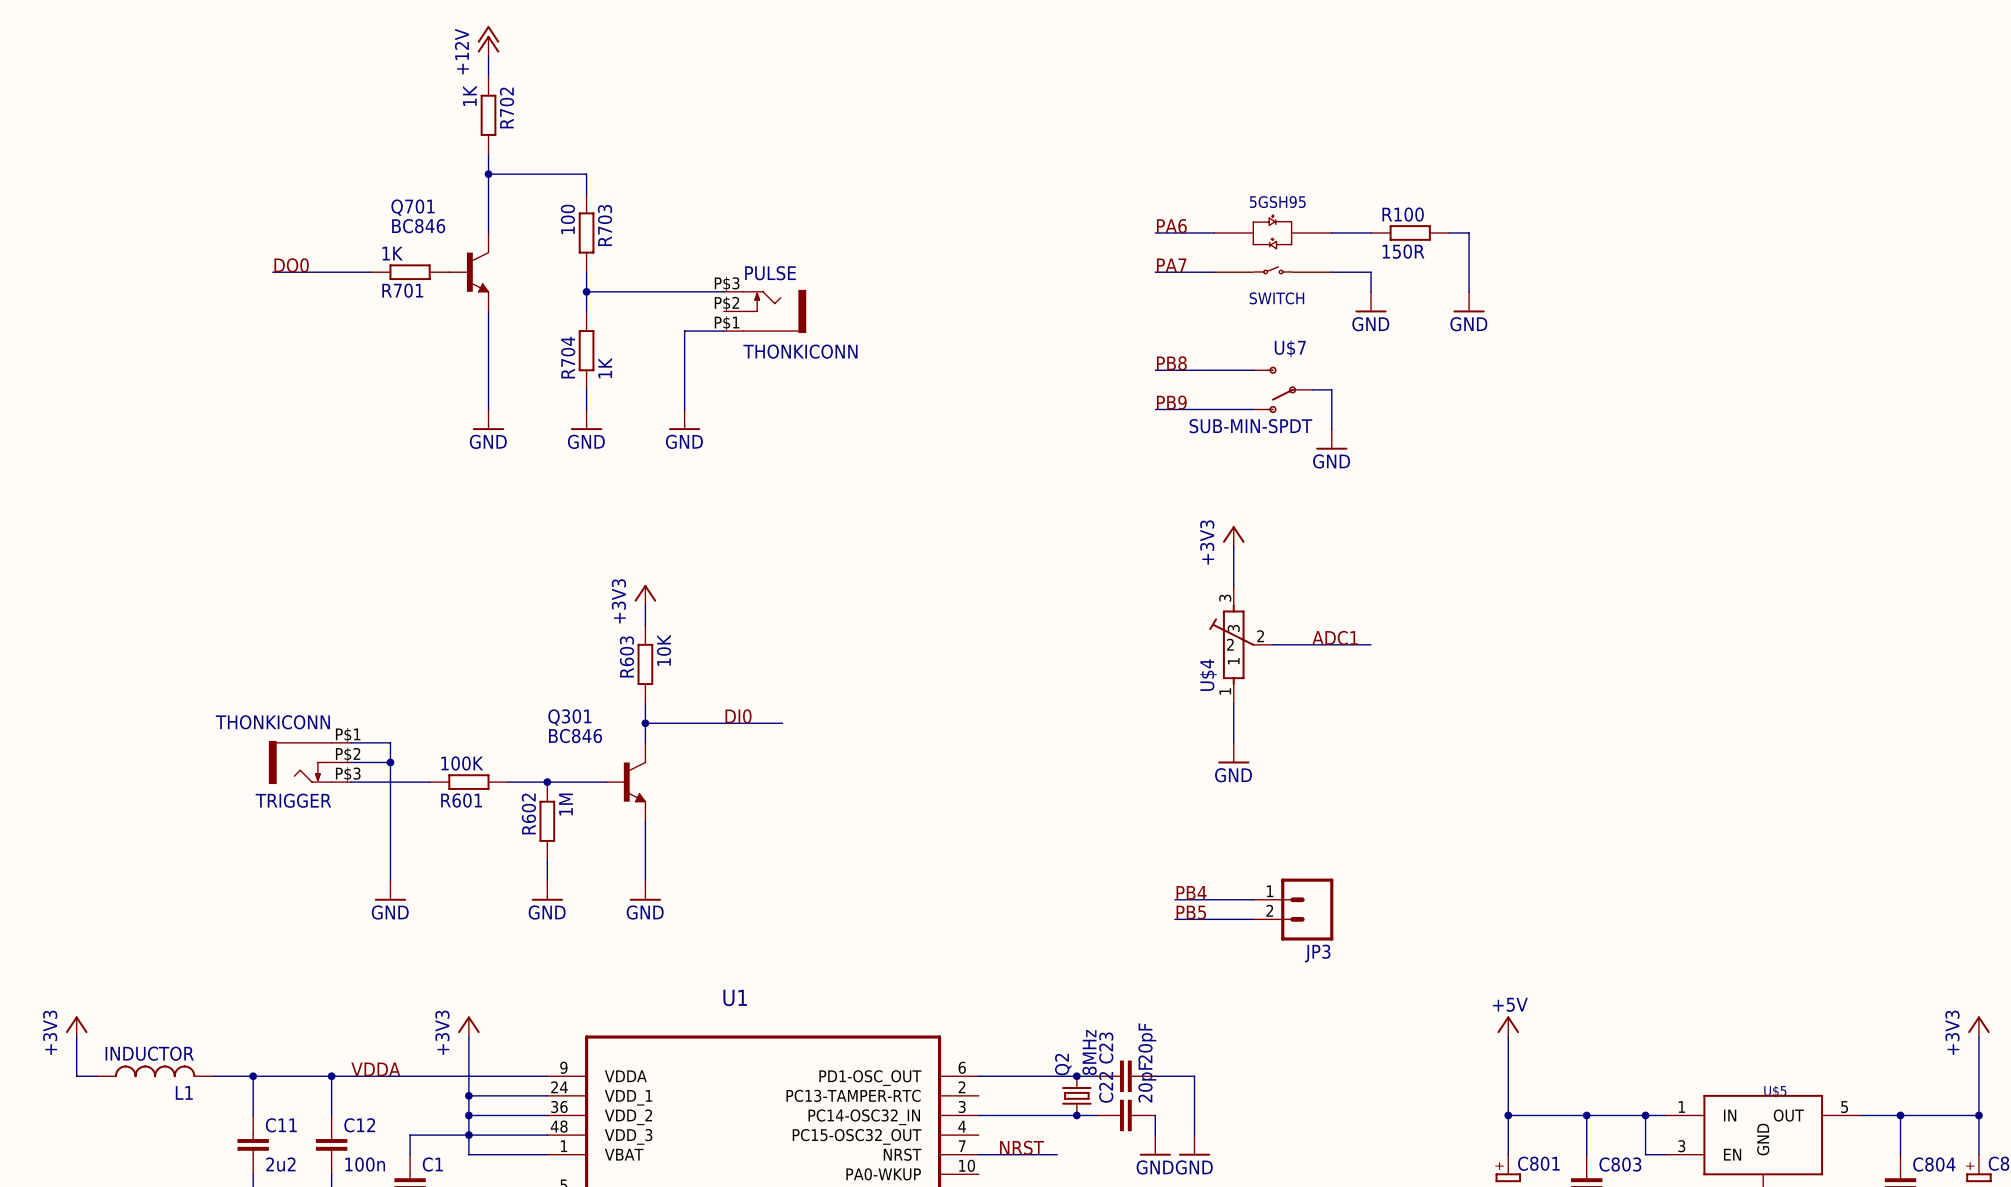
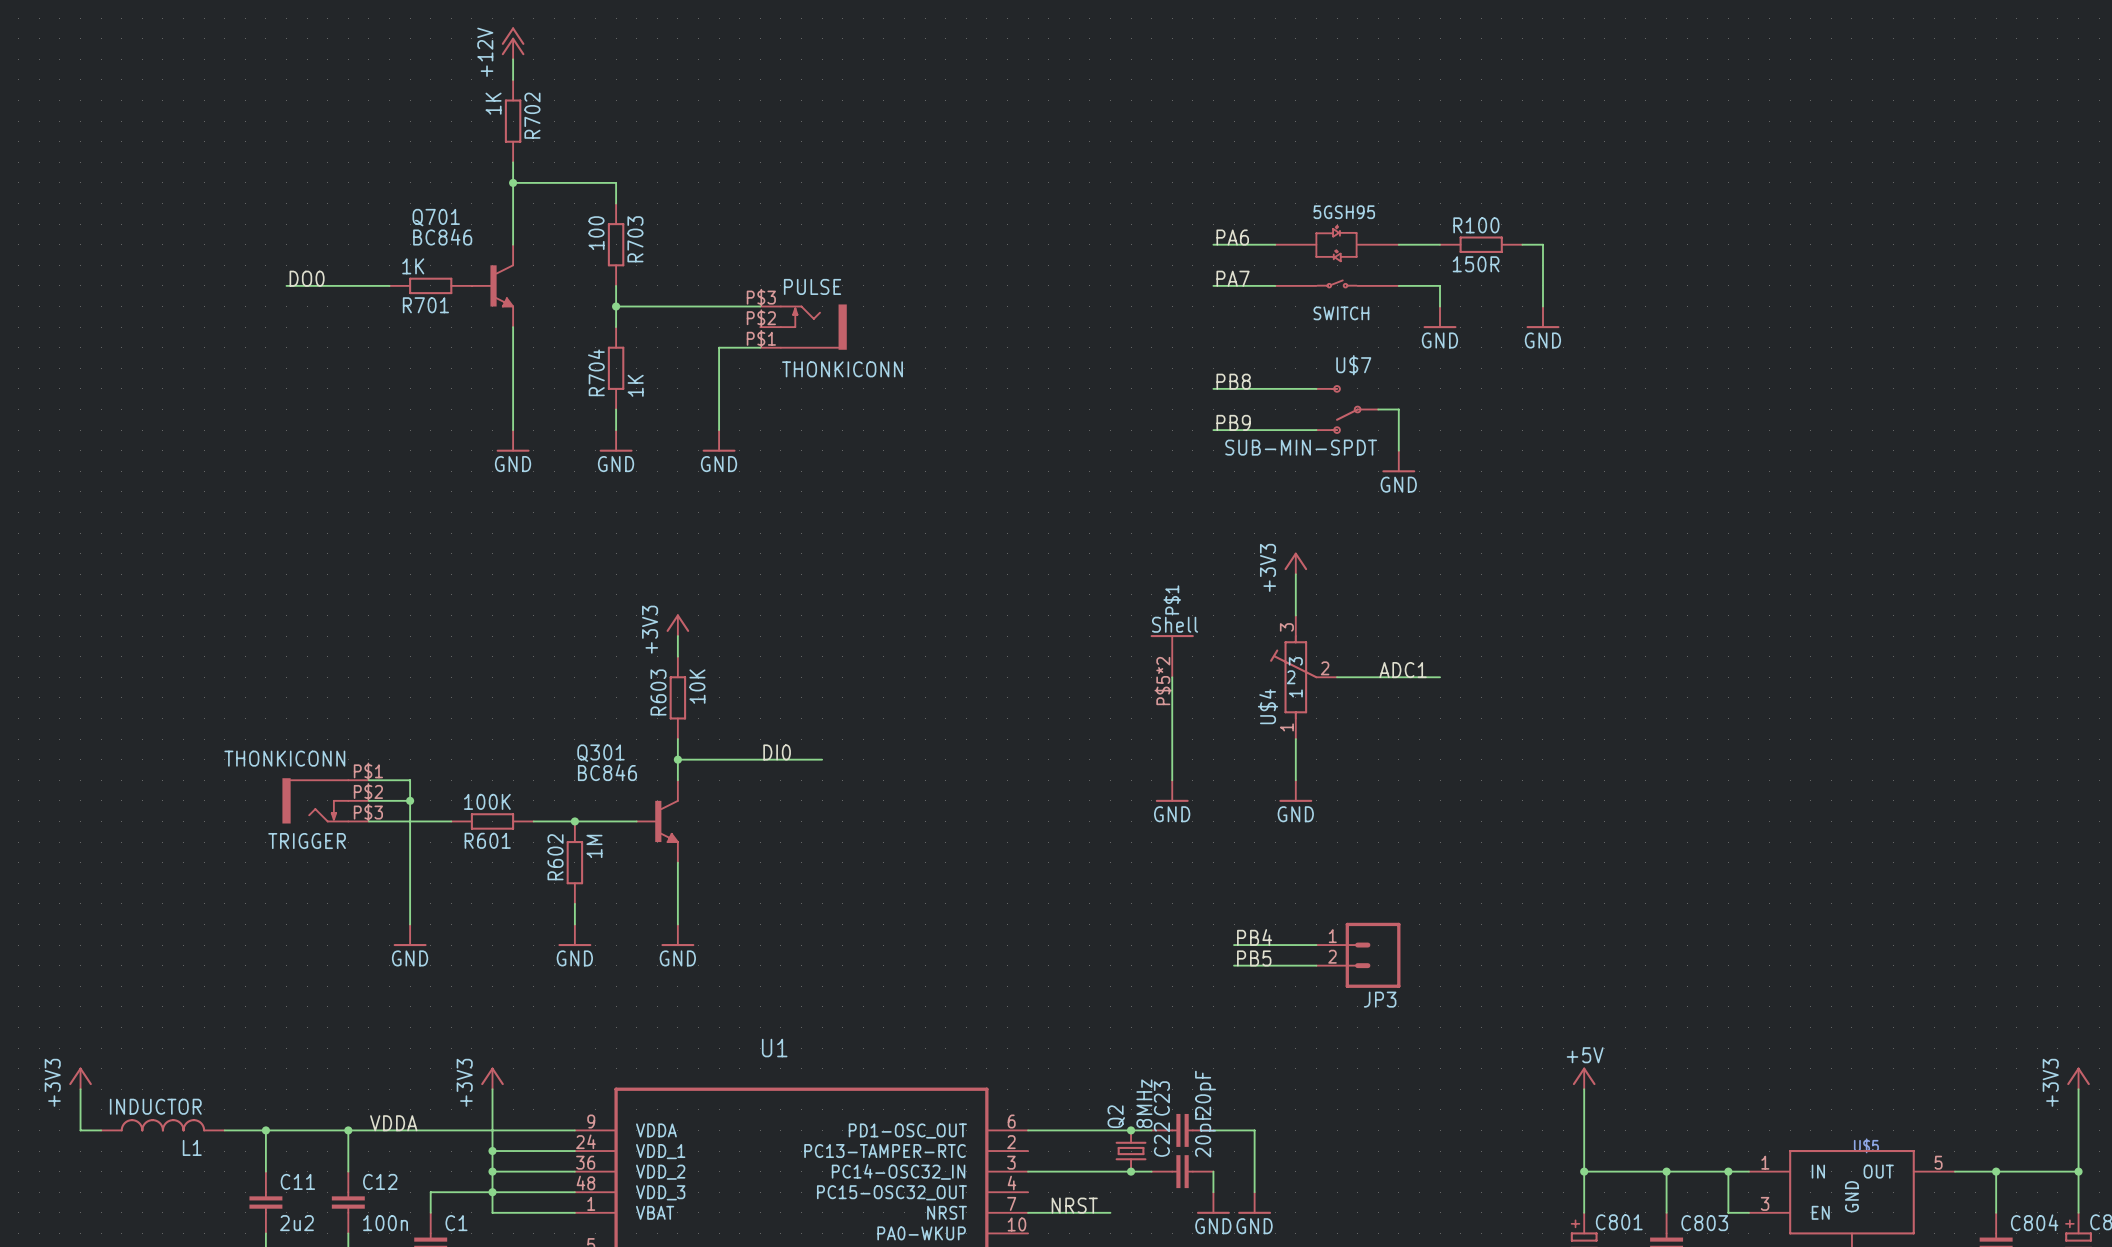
part: none -> (1172, 656)
wire: none -> (1172, 677) (1172, 780)
power symbol: none -> GND (1172, 791)

